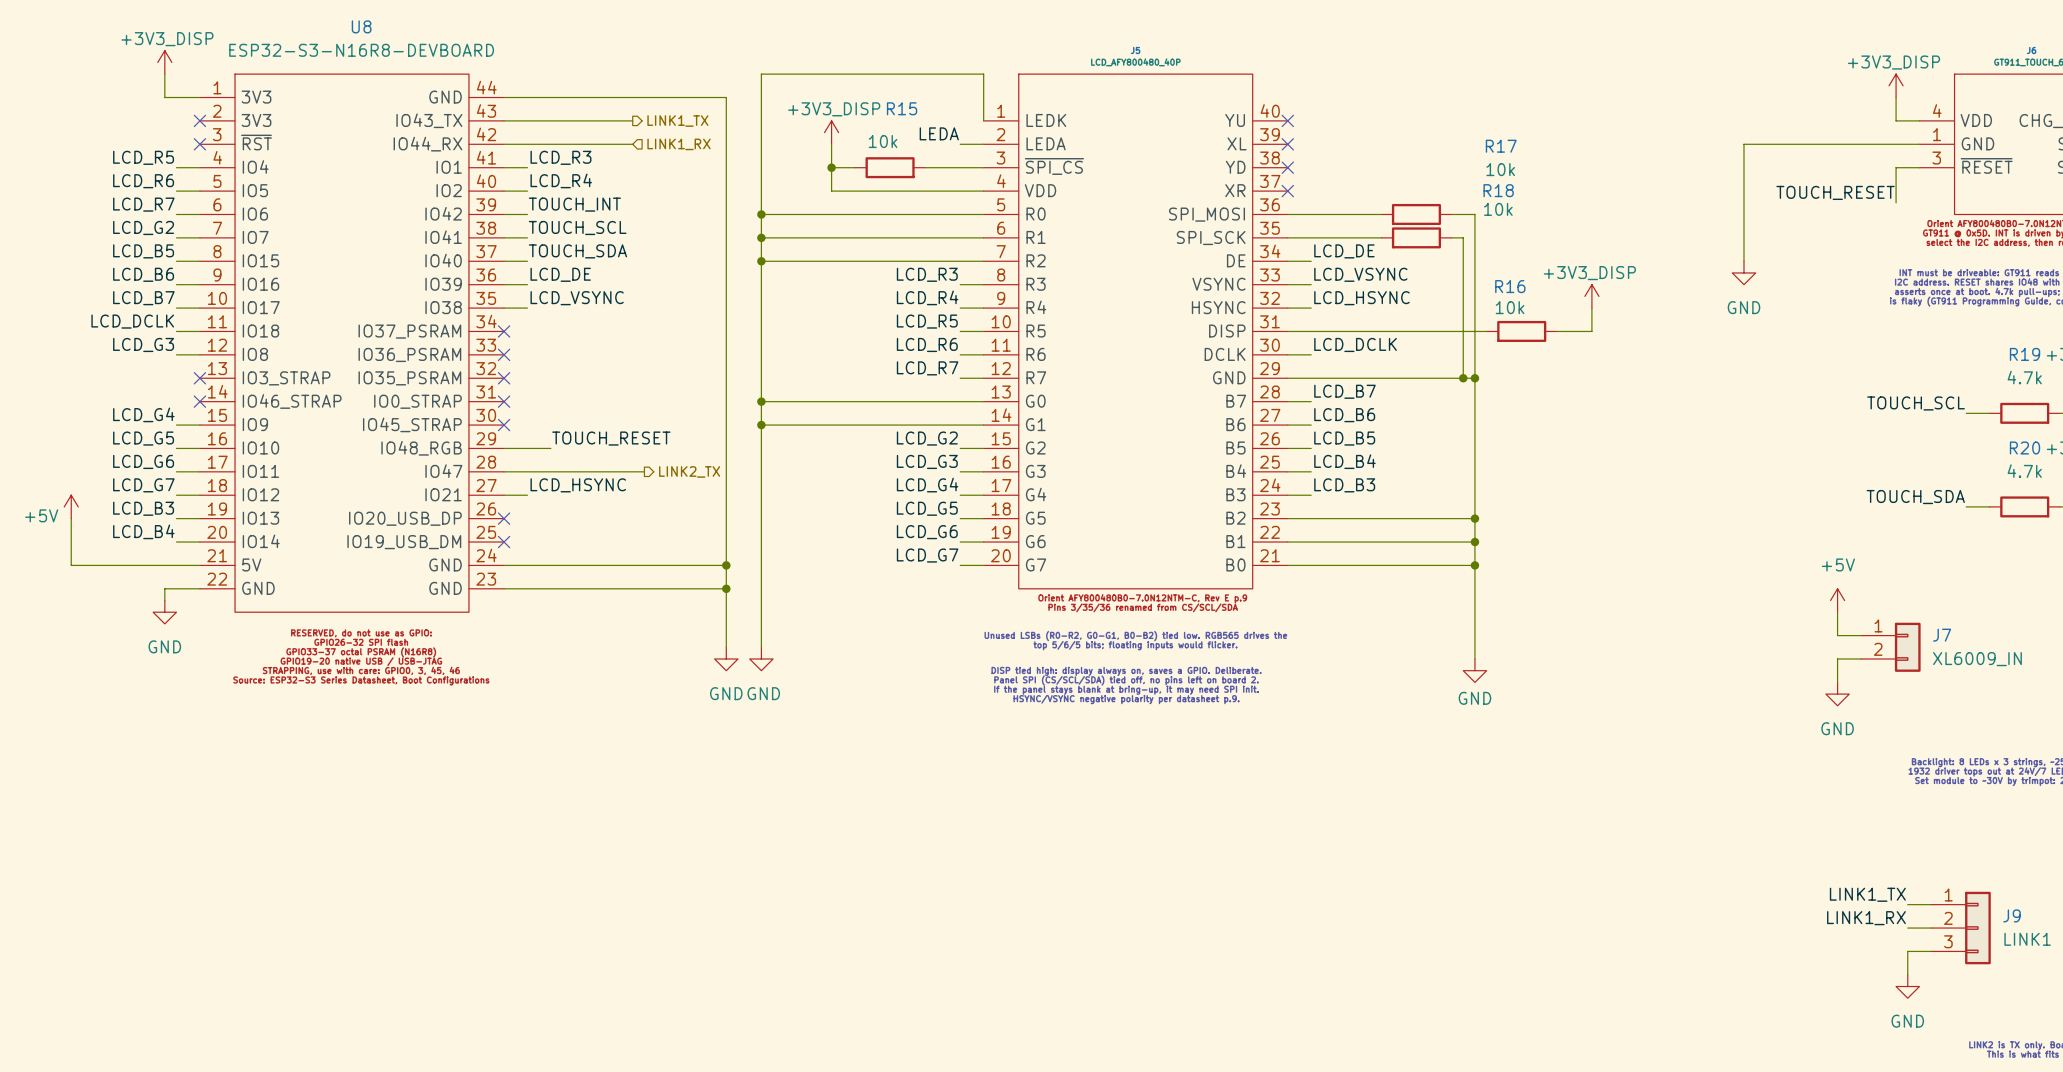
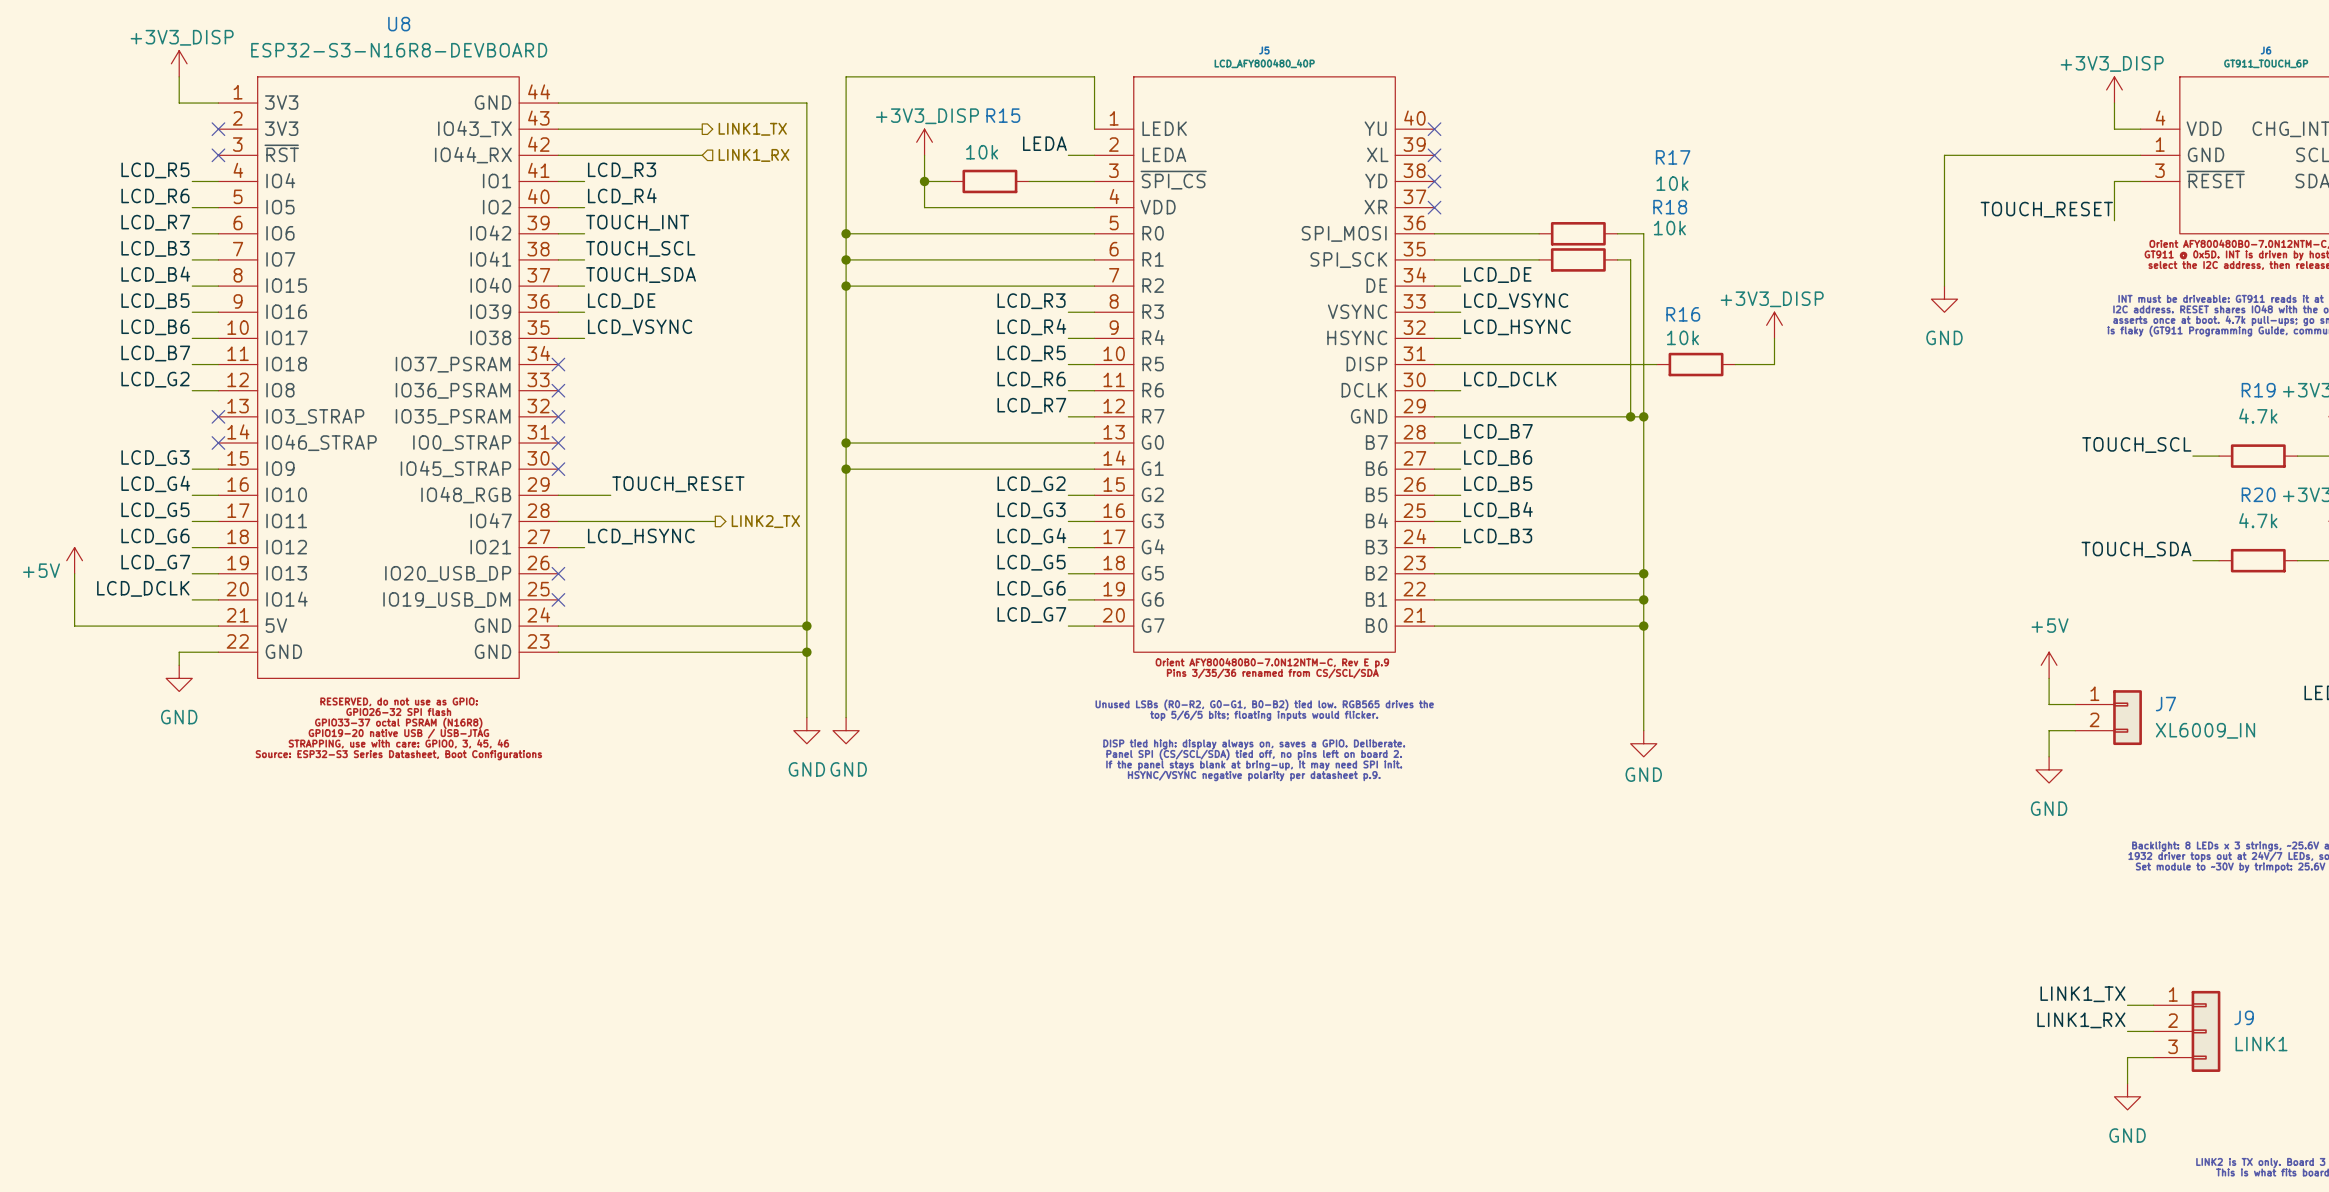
label: LCD_G2 (143, 228) -> LCD_B3 (155, 248)
label: LCD_B5 (143, 251) -> LCD_B4 (155, 274)
label: LCD_B6 (143, 274) -> LCD_B5 (155, 301)
label: LCD_B7 (143, 298) -> LCD_B6 (155, 327)
label: LCD_DCLK (132, 321) -> LCD_B7 (155, 353)
label: LCD_G3 (143, 344) -> LCD_G2 (155, 379)
label: LCD_G4 (143, 414) -> LCD_G3 (155, 458)
label: LCD_G5 (143, 438) -> LCD_G4 (155, 483)
label: LCD_G6 (143, 461) -> LCD_G5 (155, 510)
label: LCD_G7 (143, 485) -> LCD_G6 (155, 536)
label: LCD_B3 (143, 508) -> LCD_G7 (155, 562)
label: LCD_B4 (143, 531) -> LCD_DCLK (143, 588)

